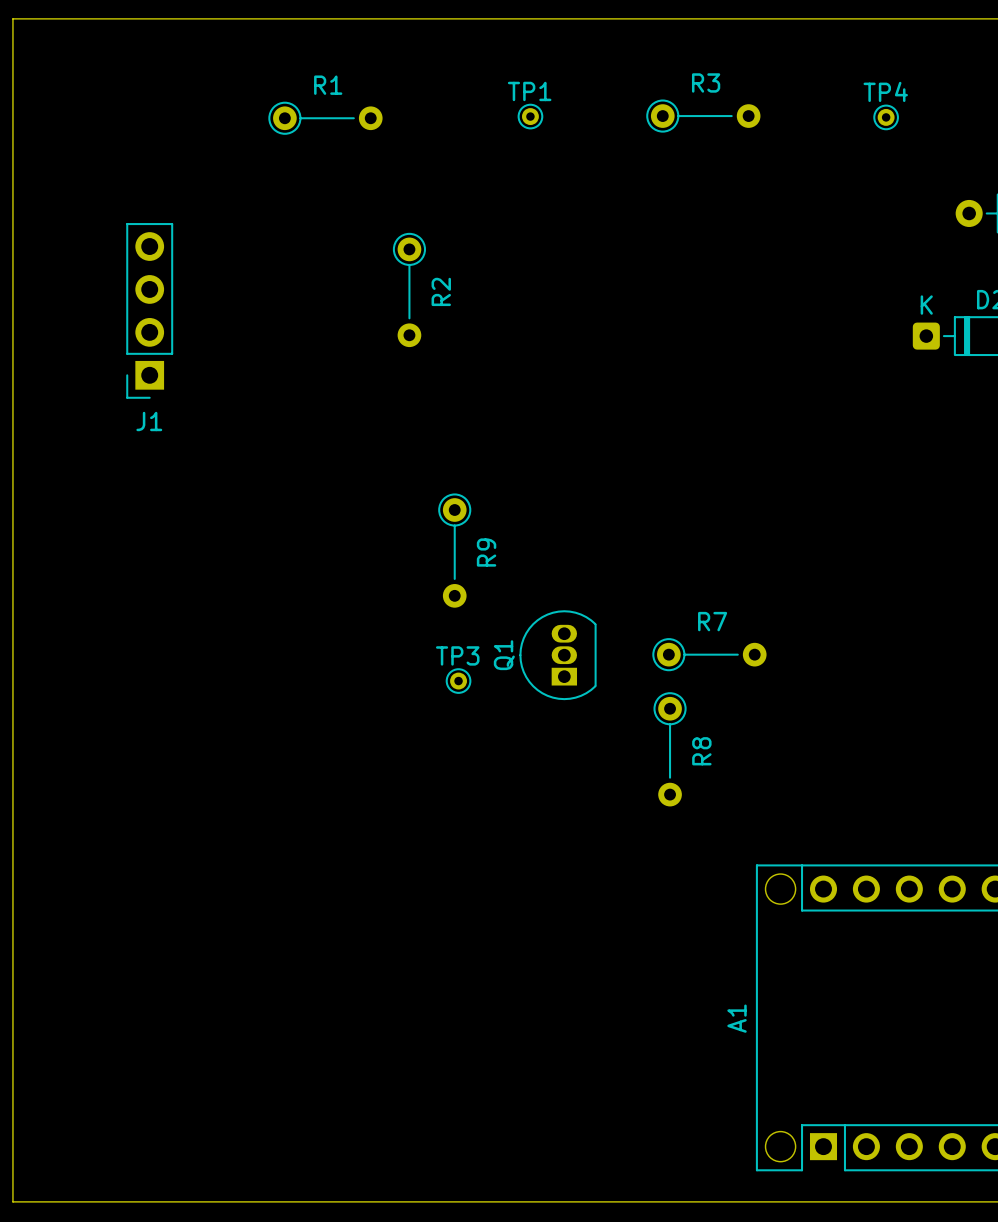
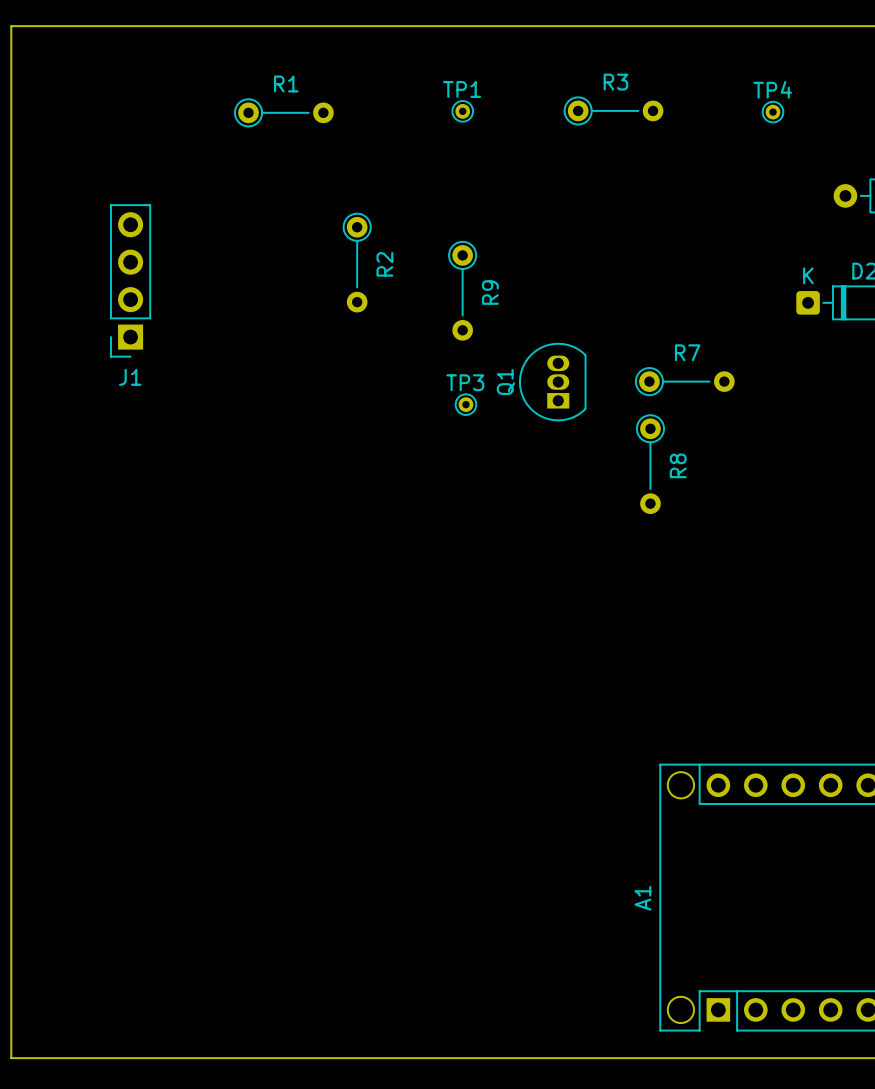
R9 position: (454, 550) -> (462, 290)
R7 position: (709, 654) -> (684, 381)
Q1 position: (558, 655) -> (552, 382)
TP3 position: (458, 681) -> (465, 404)
R8 position: (670, 749) -> (650, 464)

